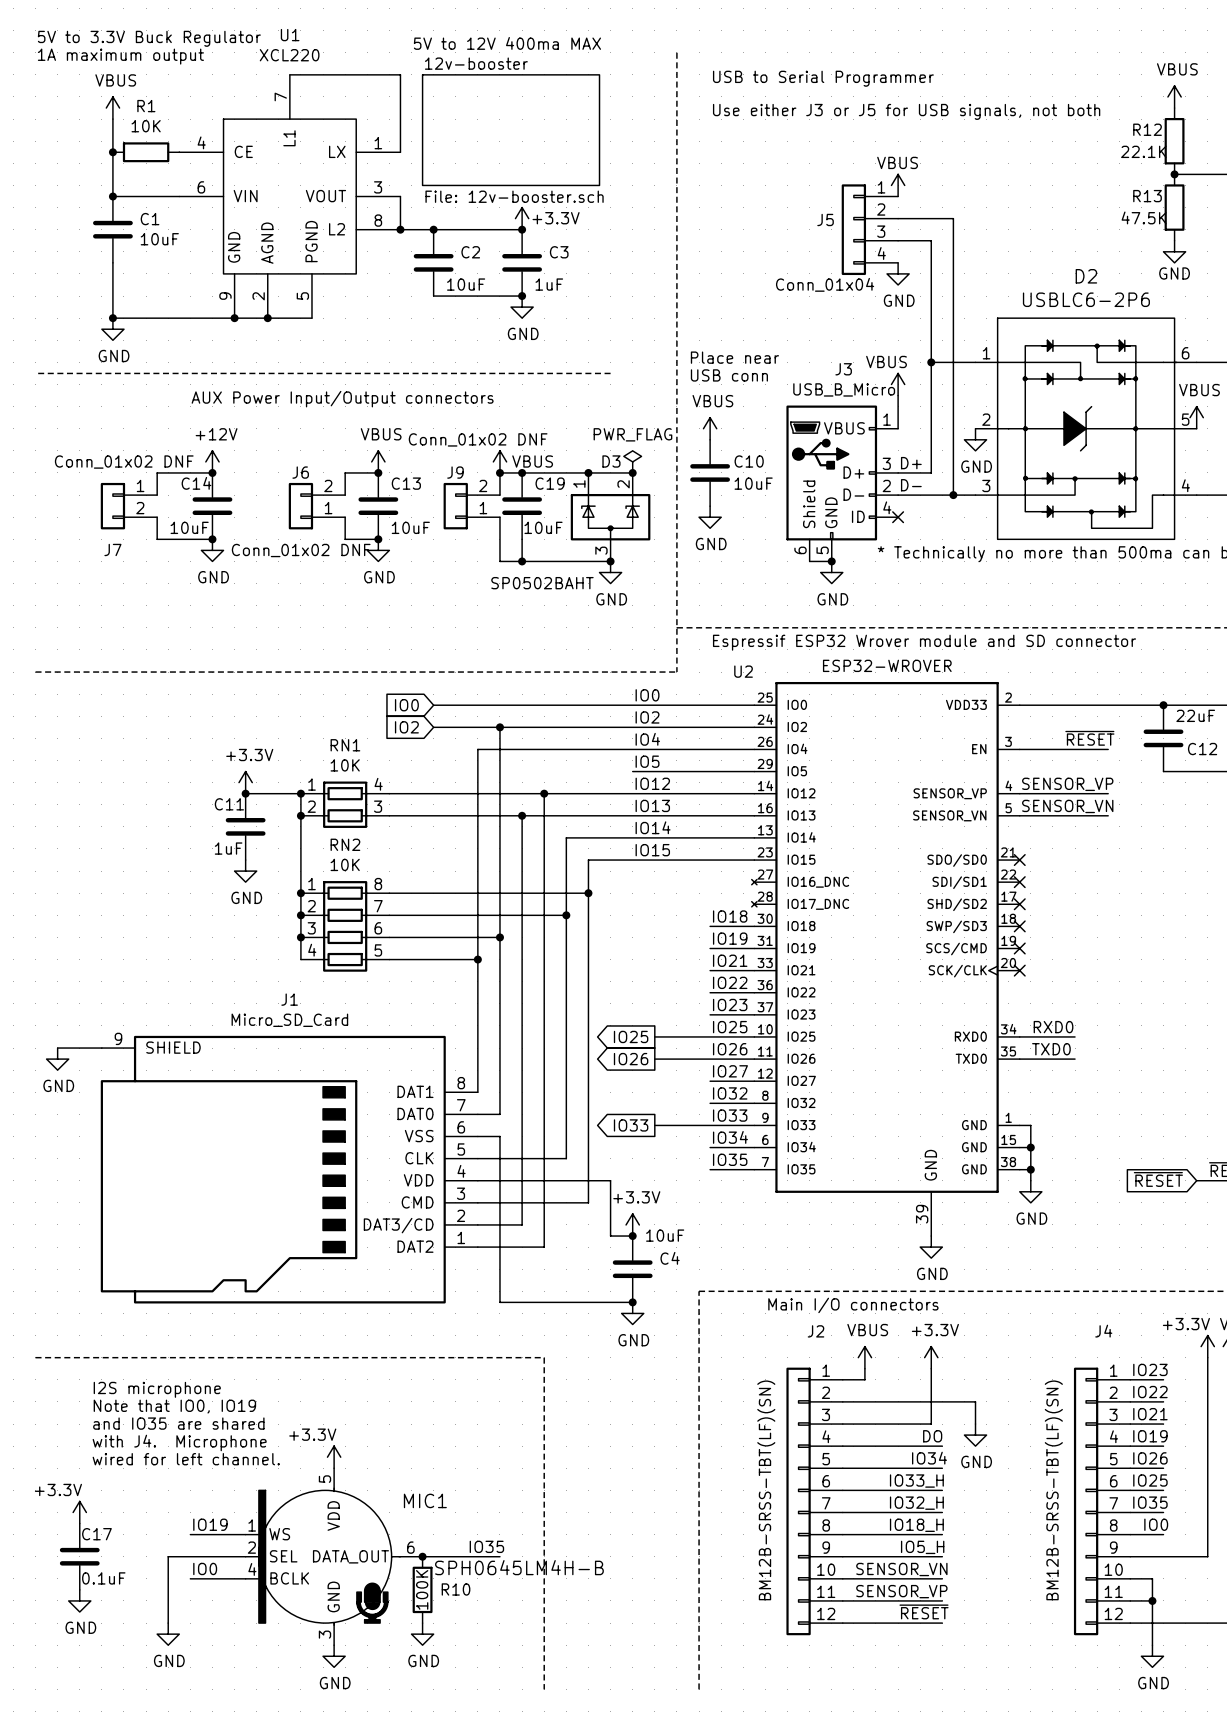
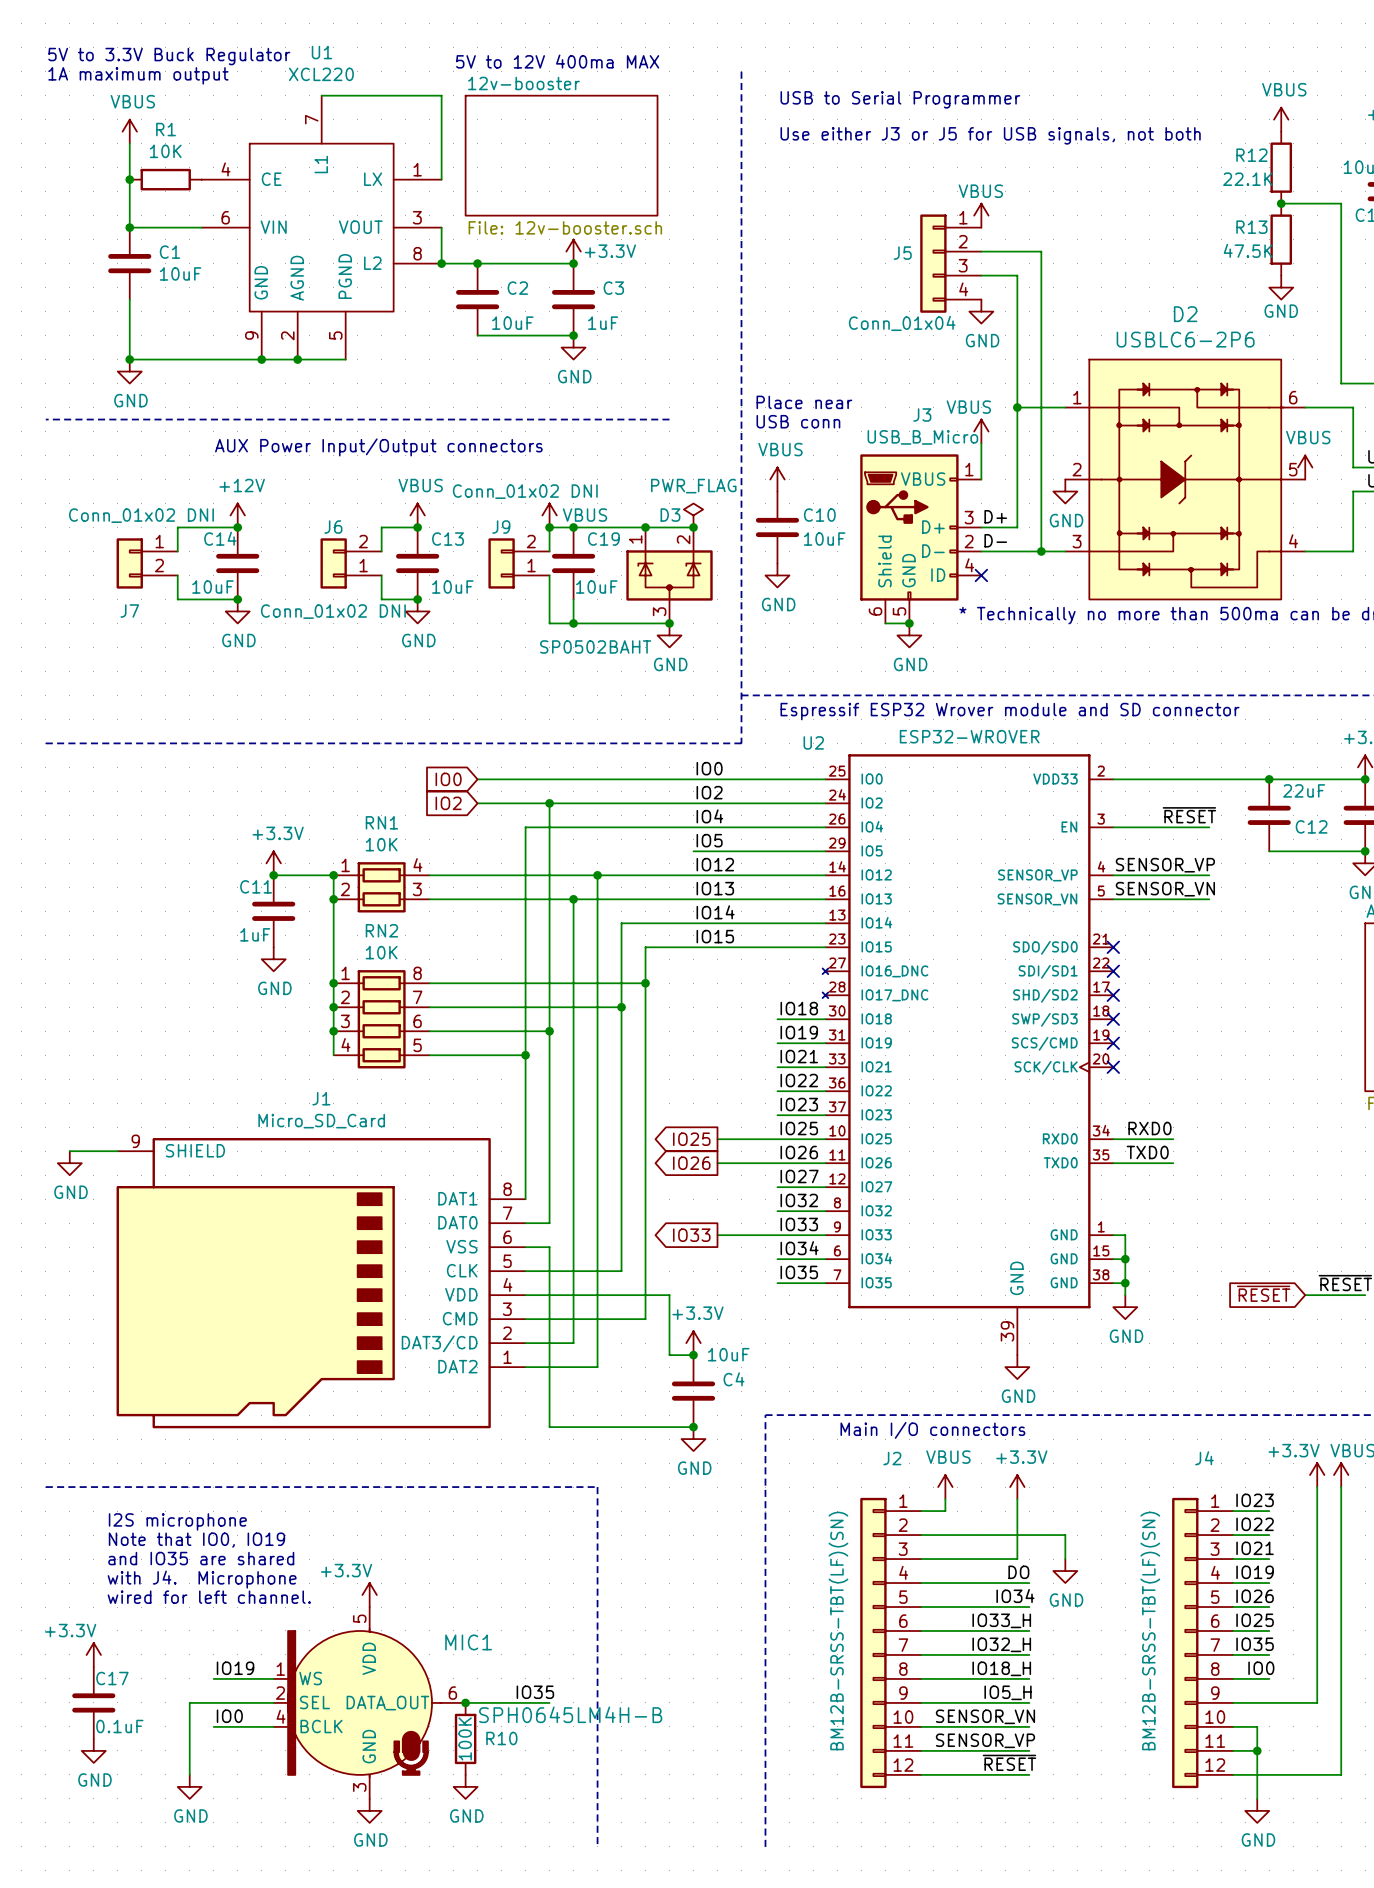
J9 value: Conn_01x02 DNF (478, 439) -> Conn_01x02 DNI (525, 491)
J7 value: Conn_01x02 DNF (124, 462) -> Conn_01x02 DNI (141, 515)
J6 value: Conn_01x02 DNF (301, 550) -> Conn_01x02 DNI (333, 611)

